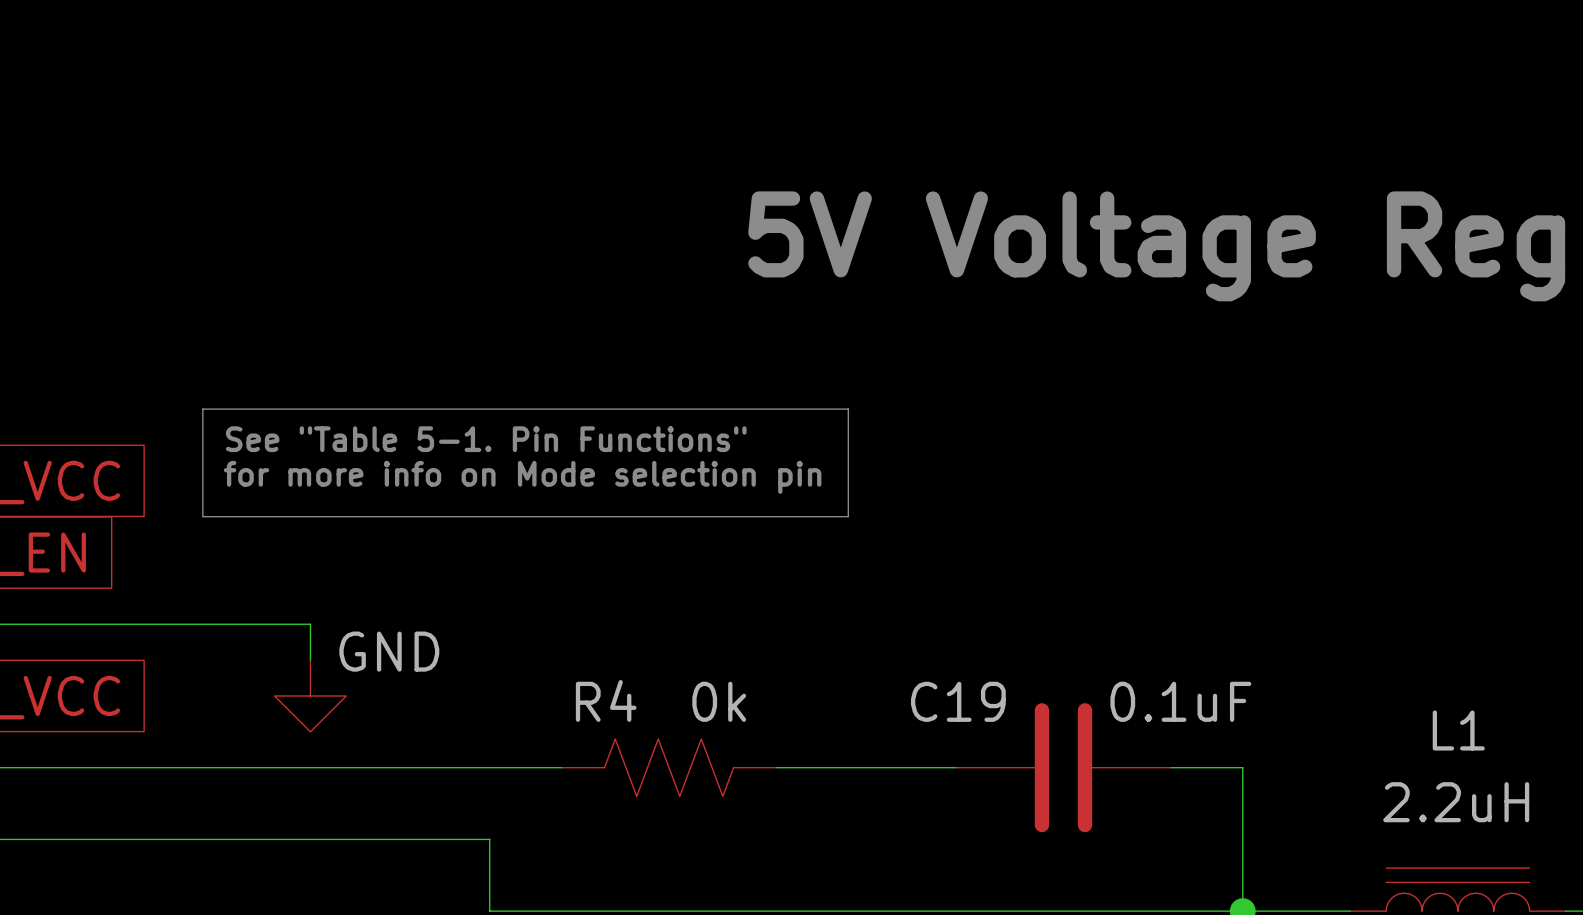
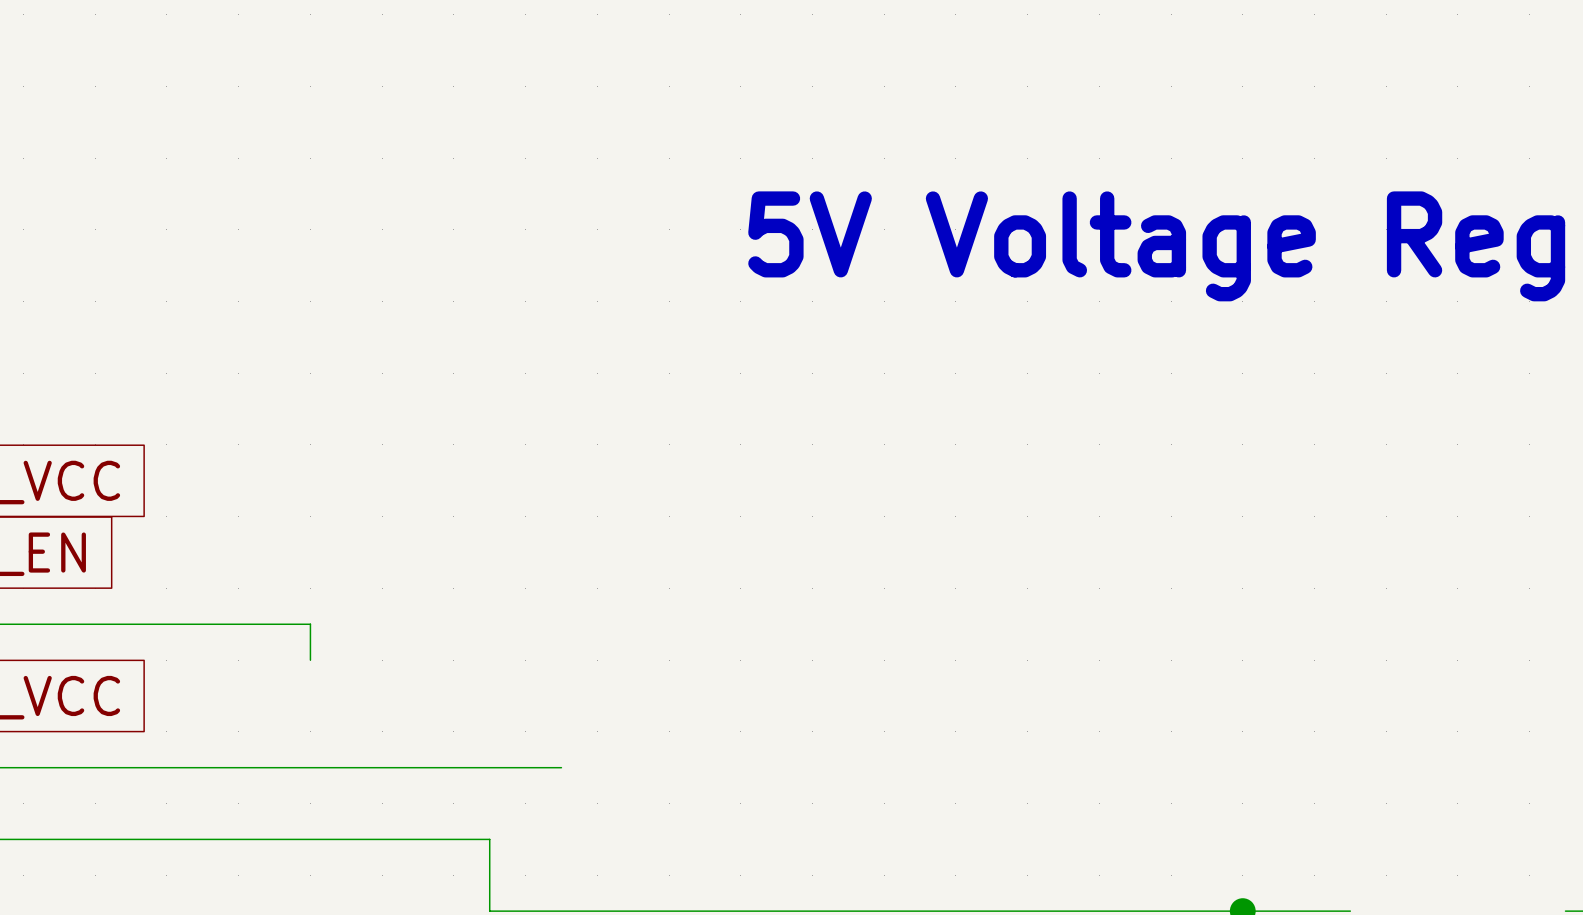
line: (202, 409) (848, 409) (848, 516) (202, 516) (202, 409) -> none
text: See "Table 5-1. Pin Functions" (486, 439) -> none
text: for more info on Mode selection pin (522, 477) -> none
power symbol: GND (310, 695) -> none
R4: 0k (669, 767) -> none
wire: (776, 767) (955, 767) -> none
C19: 0.1uF (1063, 767) -> none
wire: (1171, 767) (1242, 767) (1242, 911) -> none
L1: 2.2uH (1457, 889) -> none

